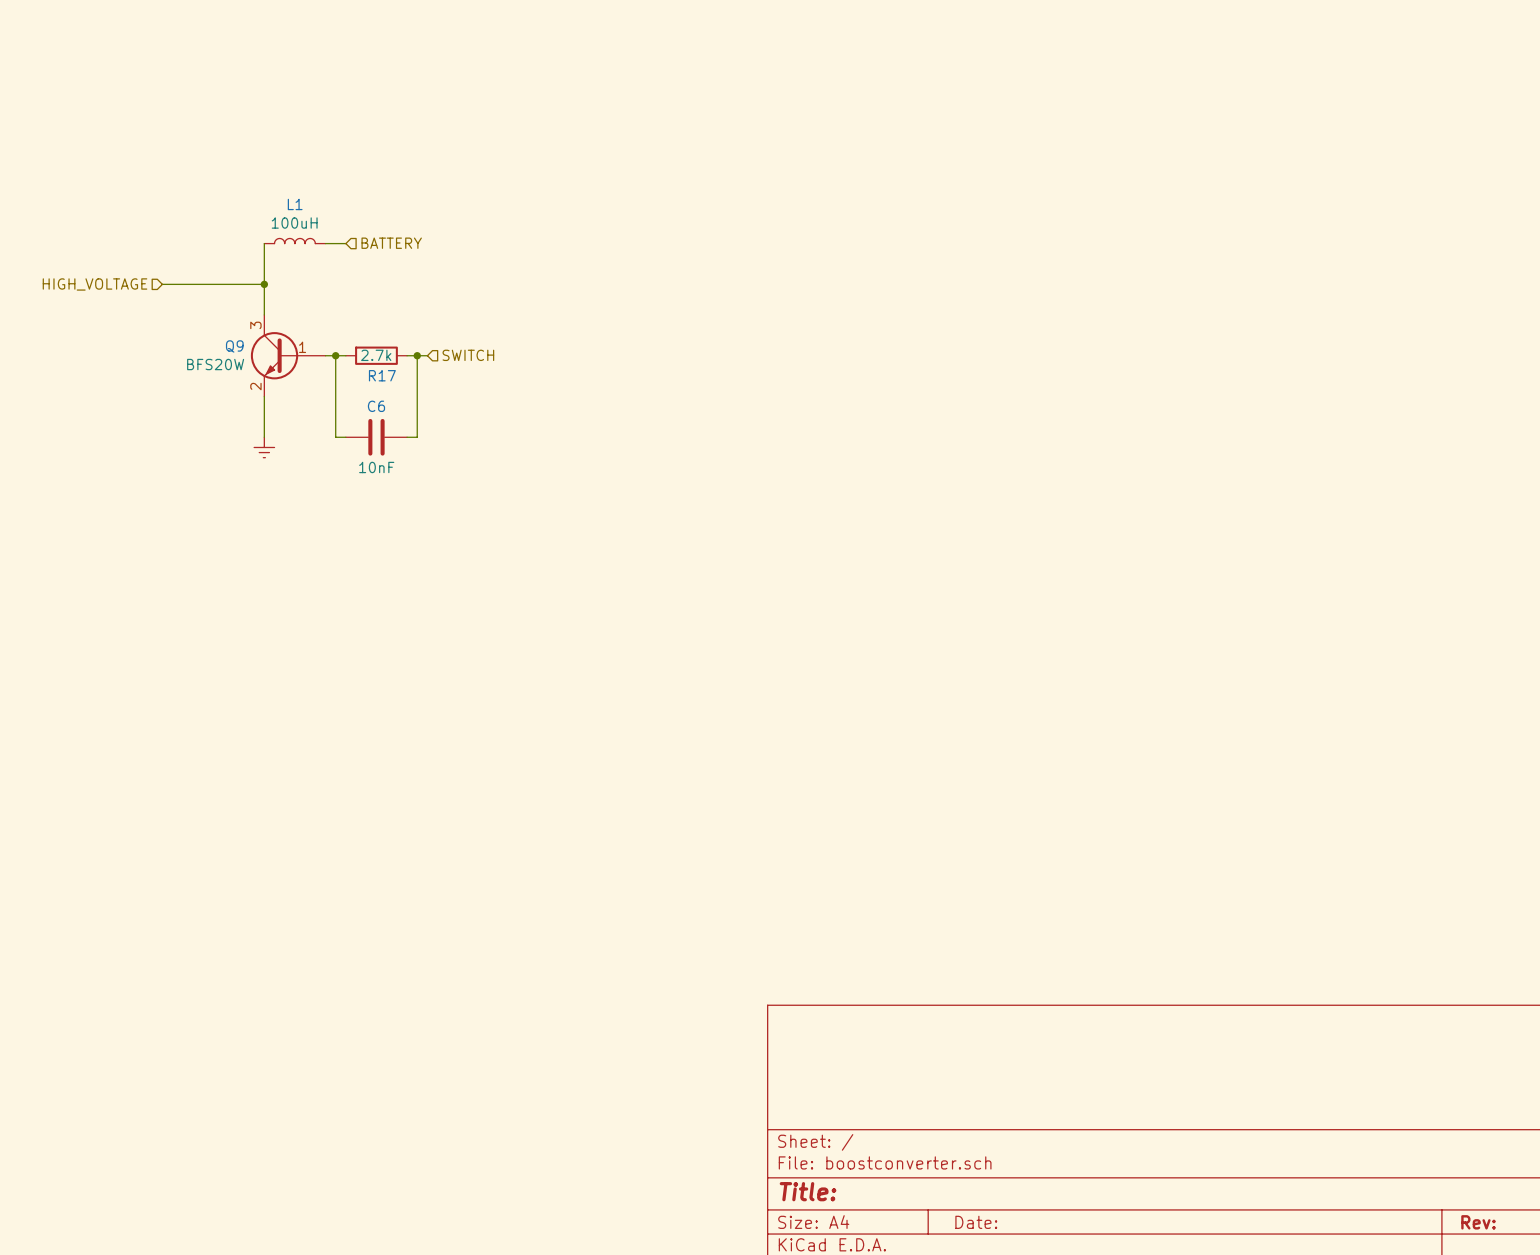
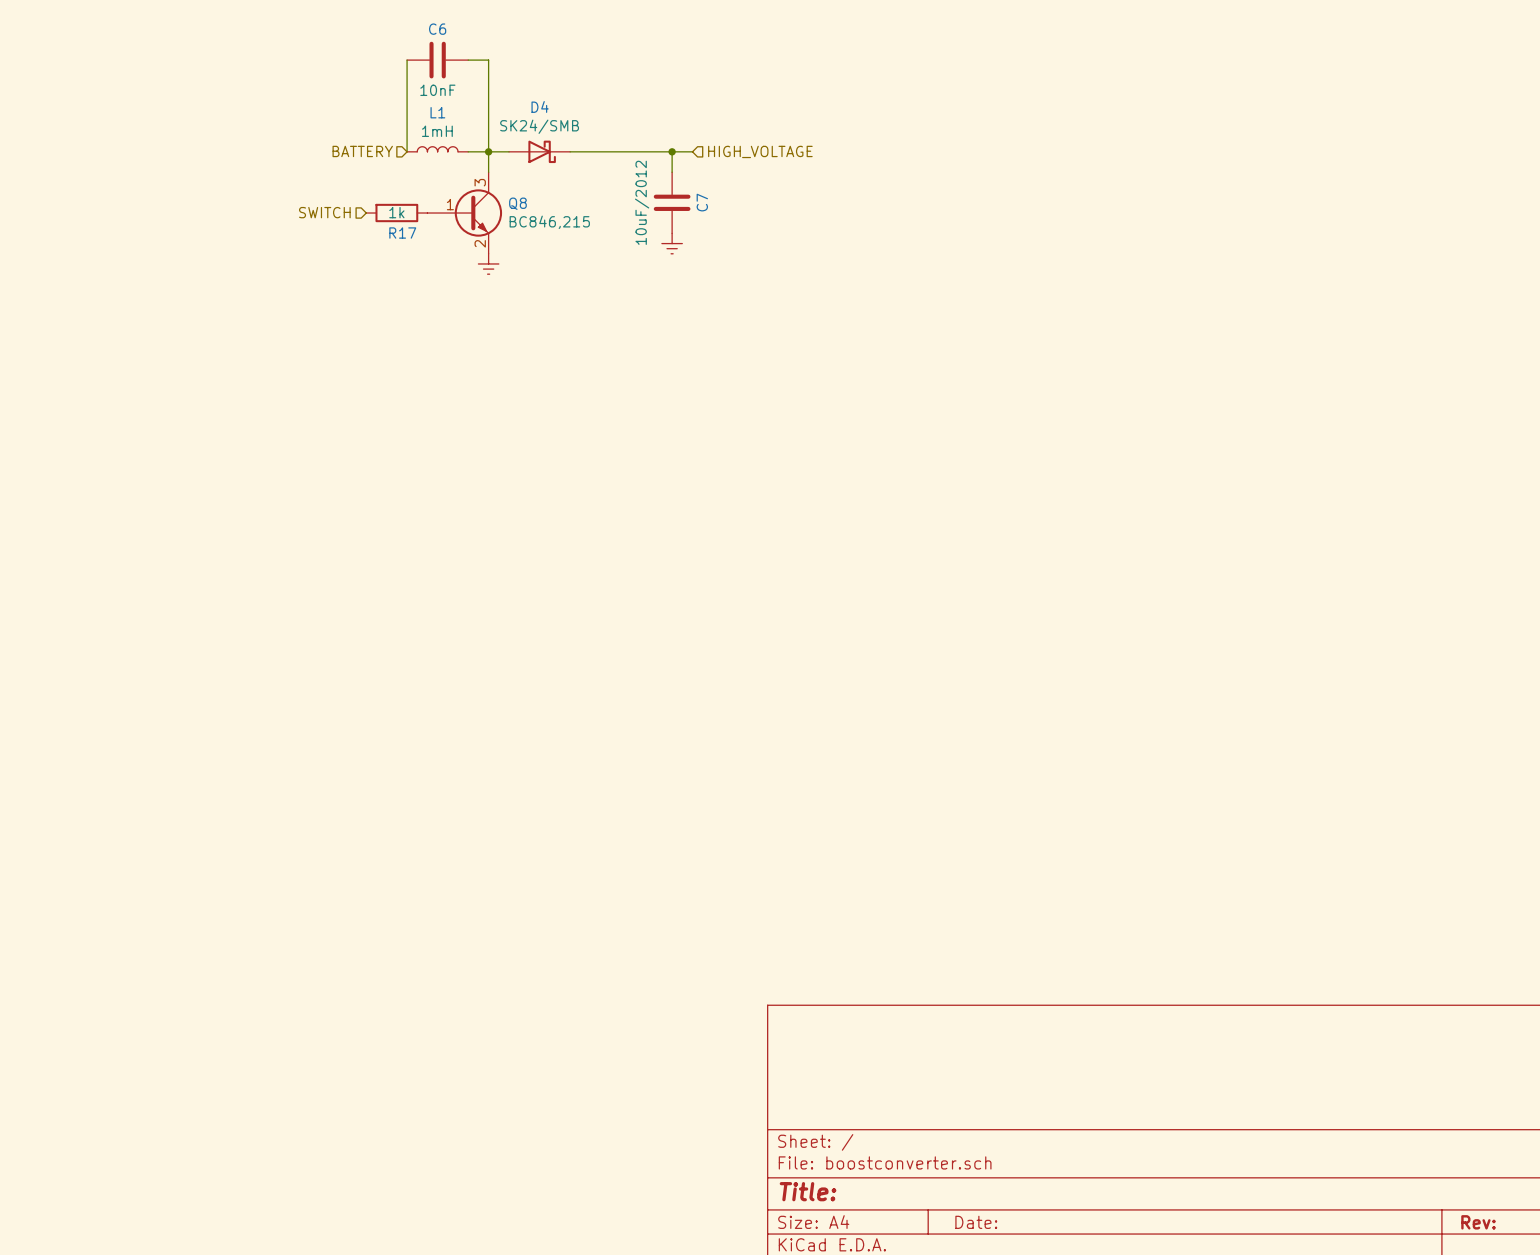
wire: none -> (407, 60) (407, 151)
wire: none -> (468, 60) (488, 60) (488, 172)
wire: none -> (468, 151) (509, 151)
junction: none -> (488, 151)
D4: none -> SK24/SMB (539, 151)
wire: none -> (570, 151) (692, 151)
wire: none -> (672, 151) (672, 172)
junction: none -> (672, 151)
hierarchical label: none -> HIGH_VOLTAGE (760, 151)
C7: none -> 10uF/2012 (672, 202)
Q8: none -> BC846,215 (464, 213)
L1 value: 100uH (294, 223) -> 1mH (437, 131)
L1 position: (294, 241) -> (437, 149)
wire: (264, 243) (264, 314) -> none
wire: (325, 243) (345, 243) -> none
hierarchical label rotation: 0° (391, 243) -> 180° (362, 151)
hierarchical label position: BATTERY (391, 243) -> BATTERY (362, 151)
power symbol: none -> (672, 243)
power symbol: none -> (488, 263)
hierarchical label: HIGH_VOLTAGE (95, 284) -> none
wire: (162, 284) (264, 284) -> none
junction: (264, 284) -> none
Q9: BFS20W (288, 355) -> none
wire: (325, 355) (345, 355) -> none
wire: (335, 355) (335, 437) (345, 437) -> none
junction: (335, 355) -> none
R17 position: (376, 355) -> (396, 213)
R17 value: 2.7k (376, 355) -> 1k (396, 212)
wire: (407, 355) (427, 355) -> none
wire: (417, 355) (417, 437) (407, 437) -> none
junction: (417, 355) -> none
hierarchical label rotation: 0° (468, 355) -> 180° (324, 212)
hierarchical label position: SWITCH (468, 355) -> SWITCH (324, 212)
wire: (264, 396) (264, 437) -> none
C6 position: (376, 437) -> (437, 60)
power symbol: (264, 447) -> none

